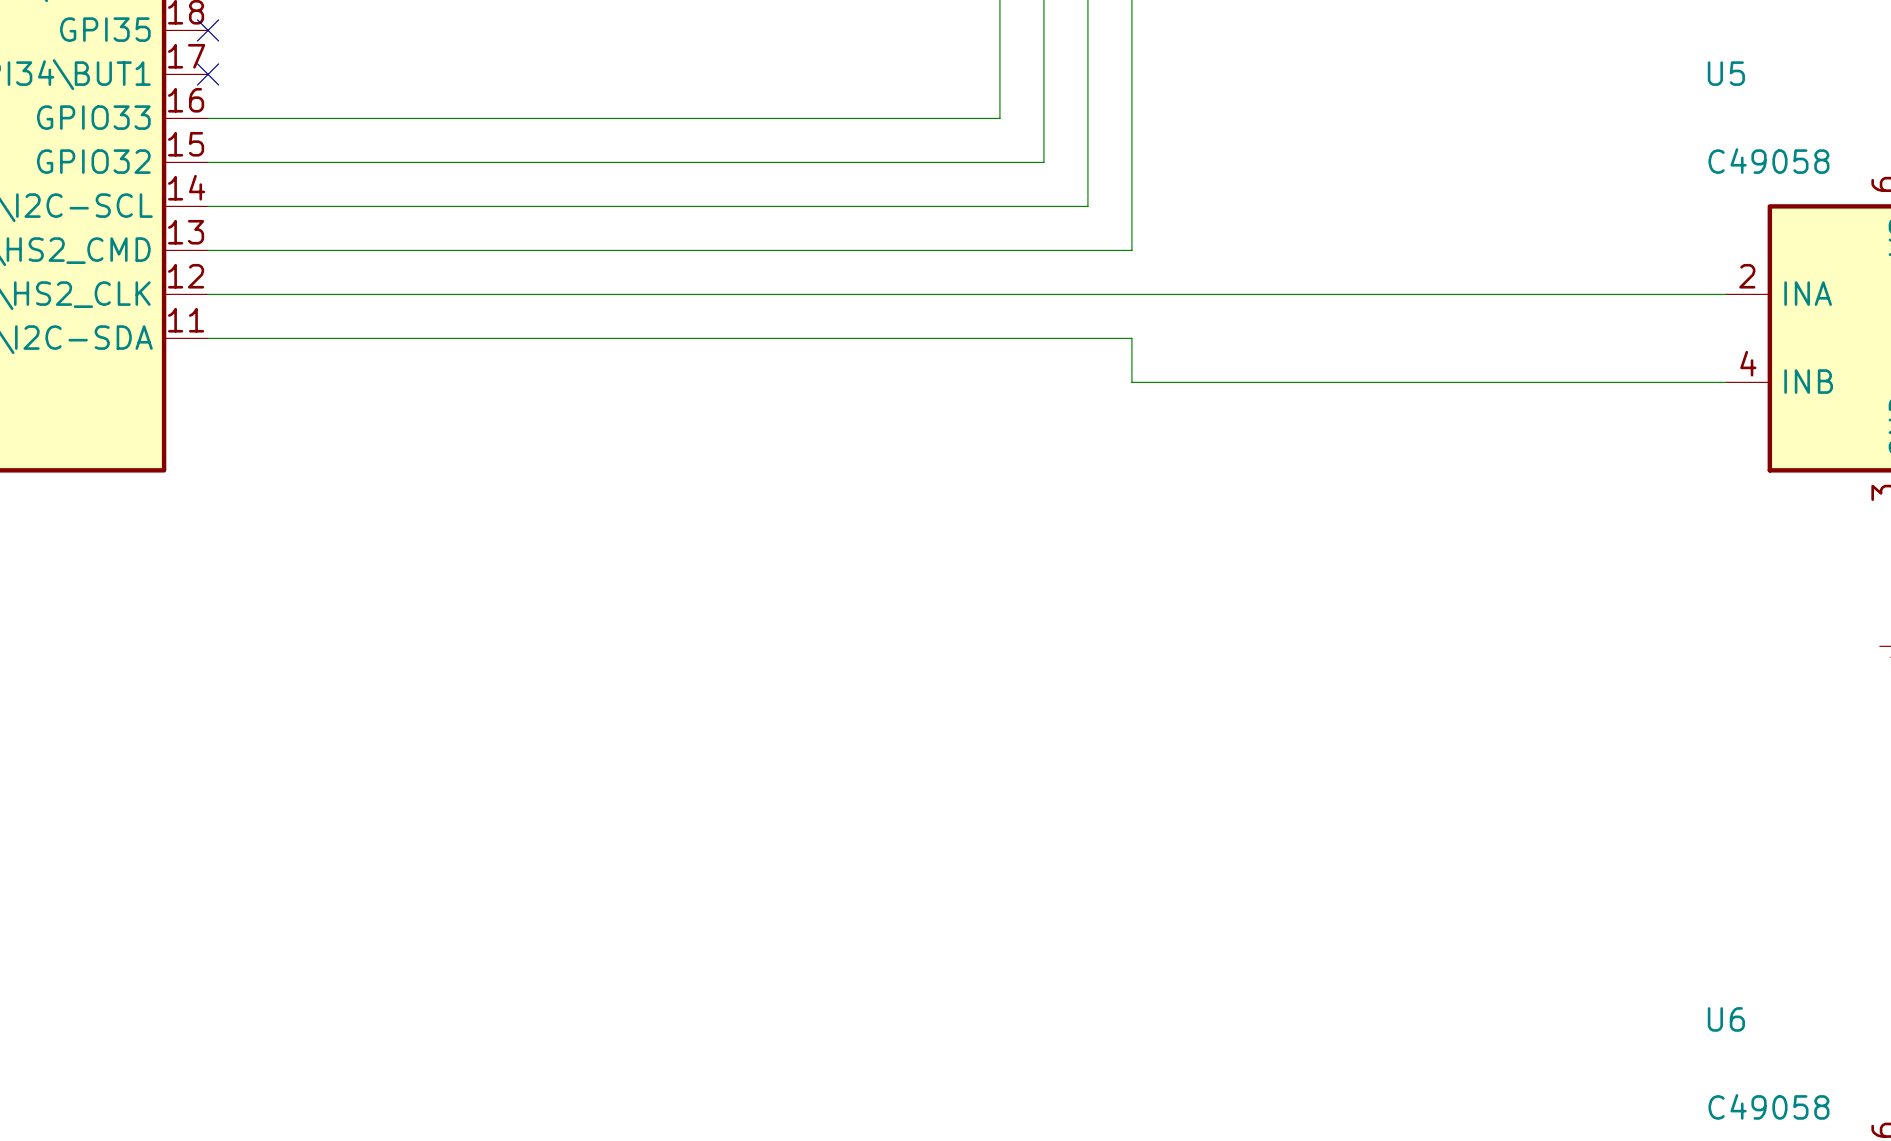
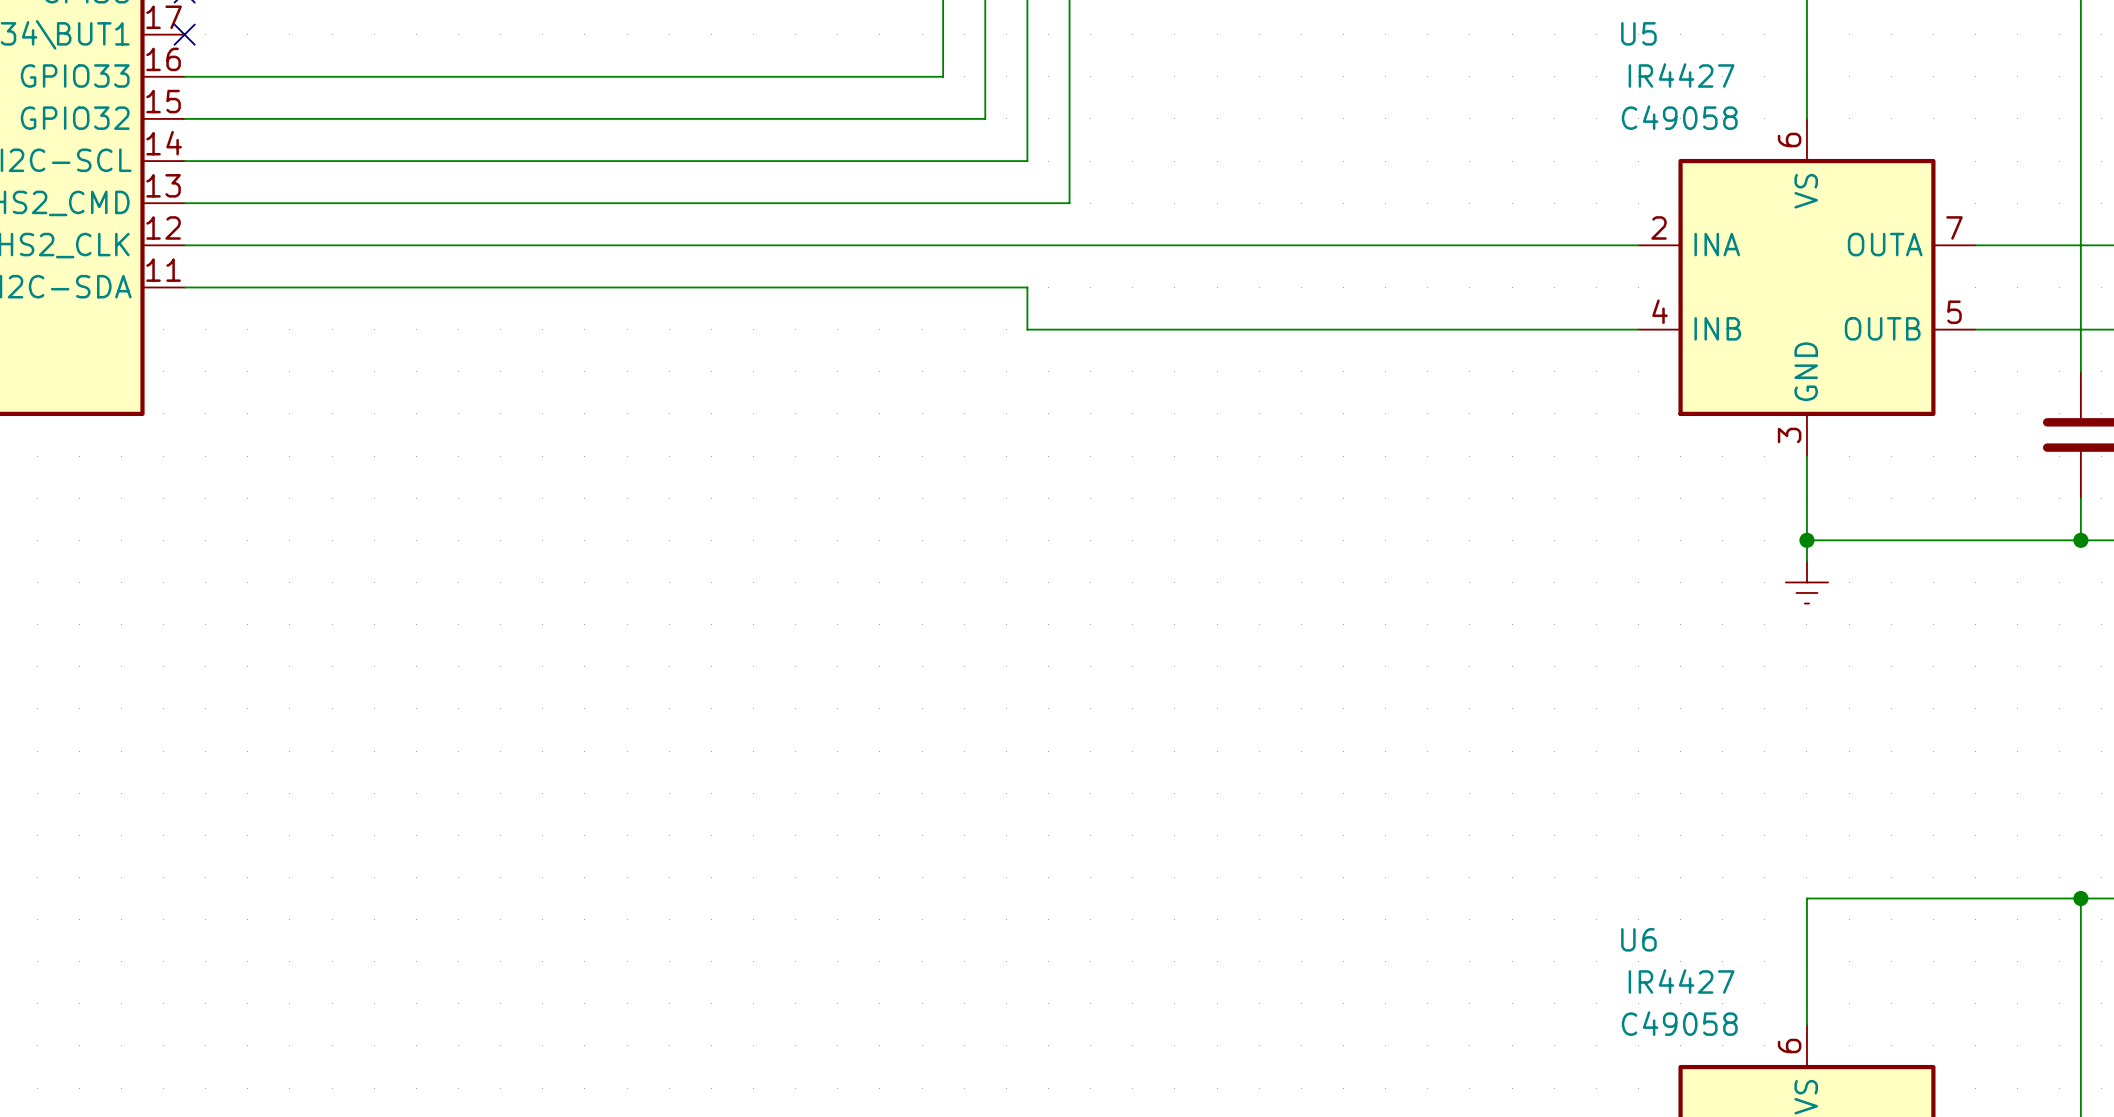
U5 value: none -> IR4427 (1681, 75)
wire: (1087, 338) (1131, 338) (1131, 382) -> (1027, 287) (1027, 329) (1069, 329)
U6 value: none -> IR4427 (1681, 981)

